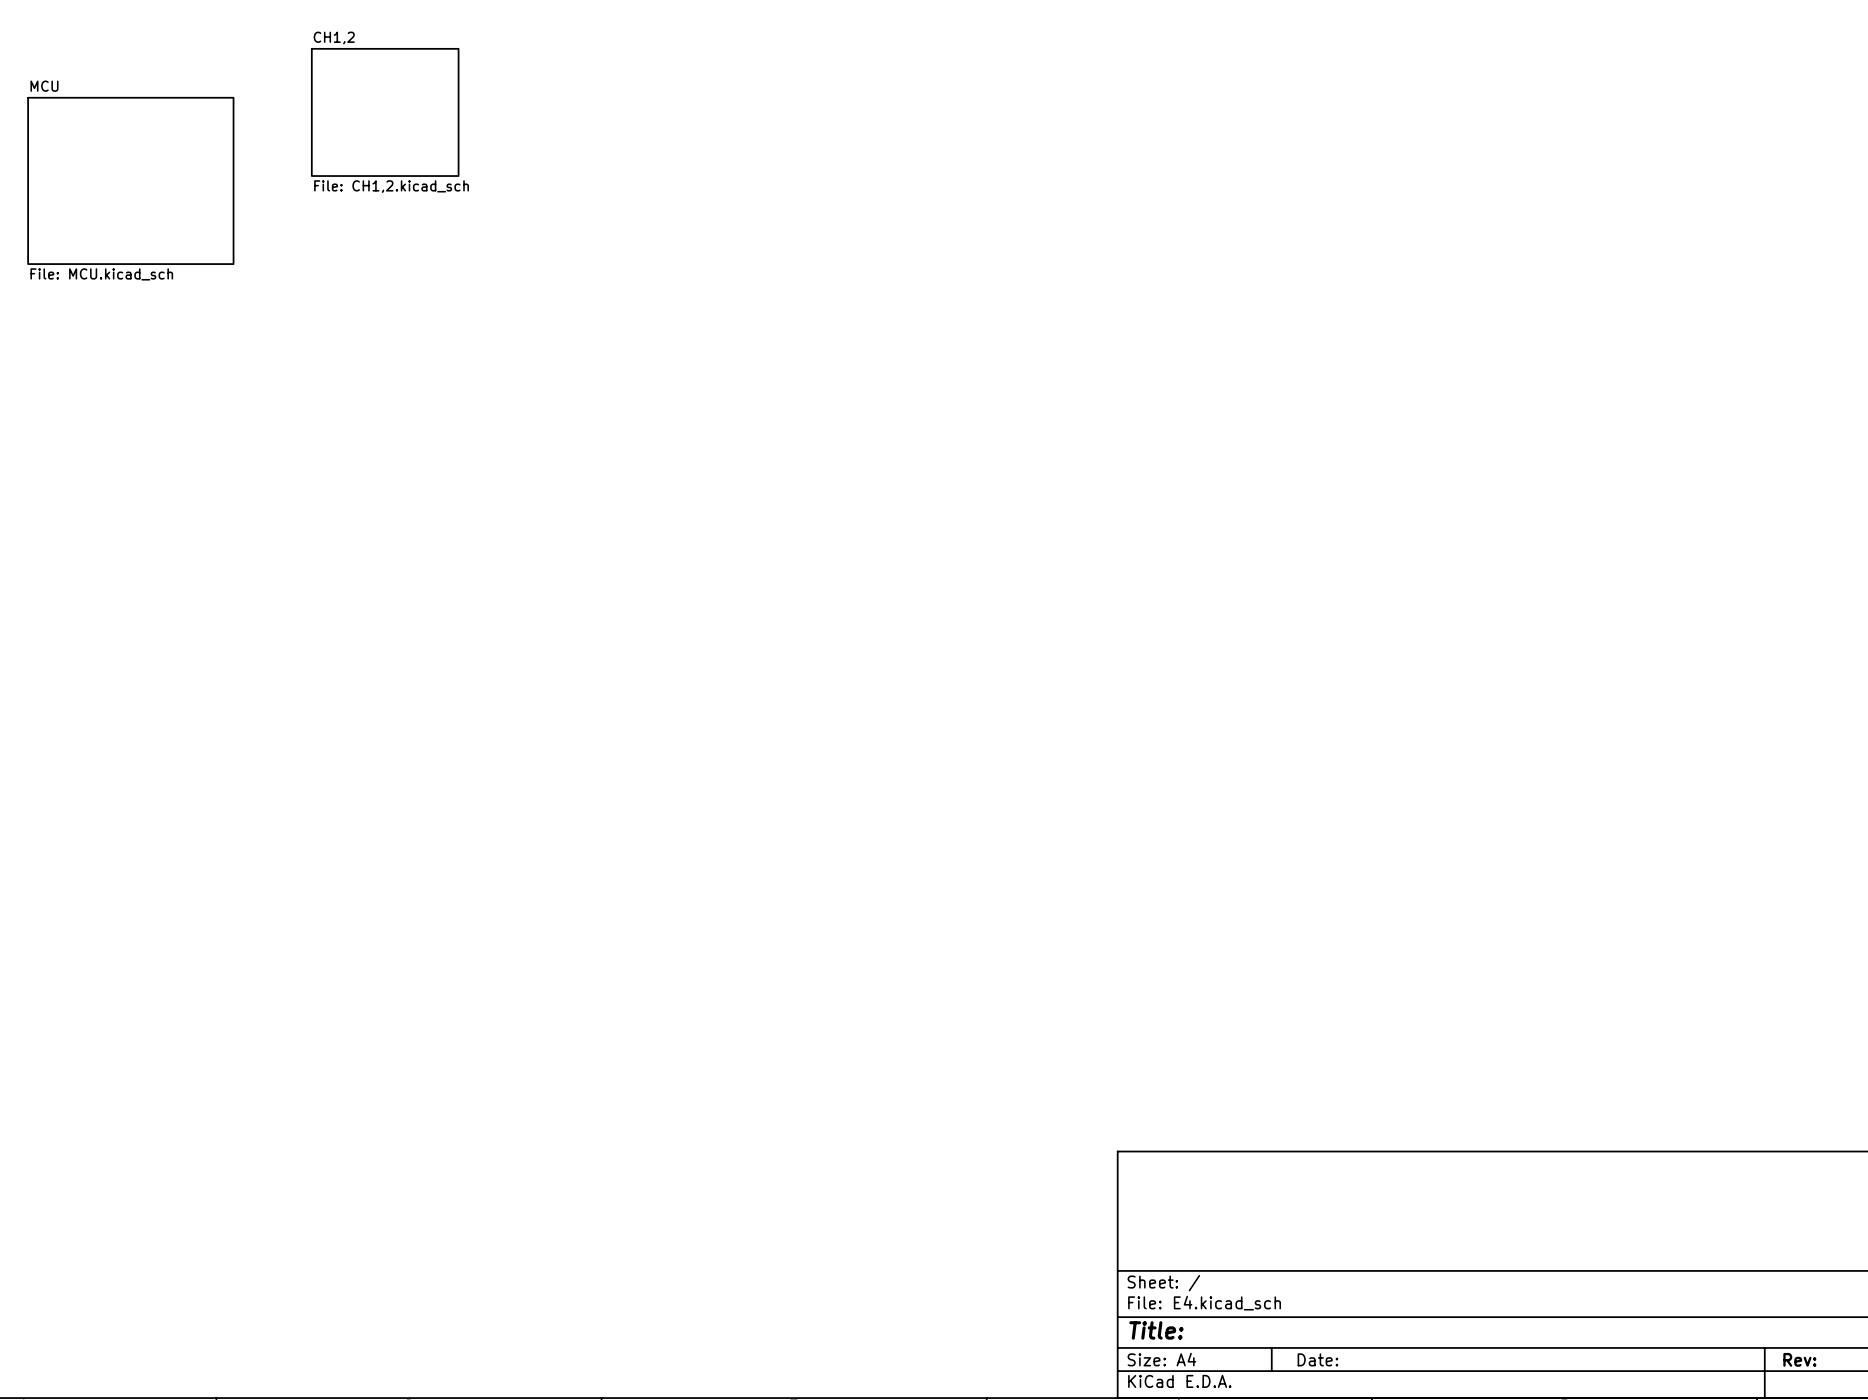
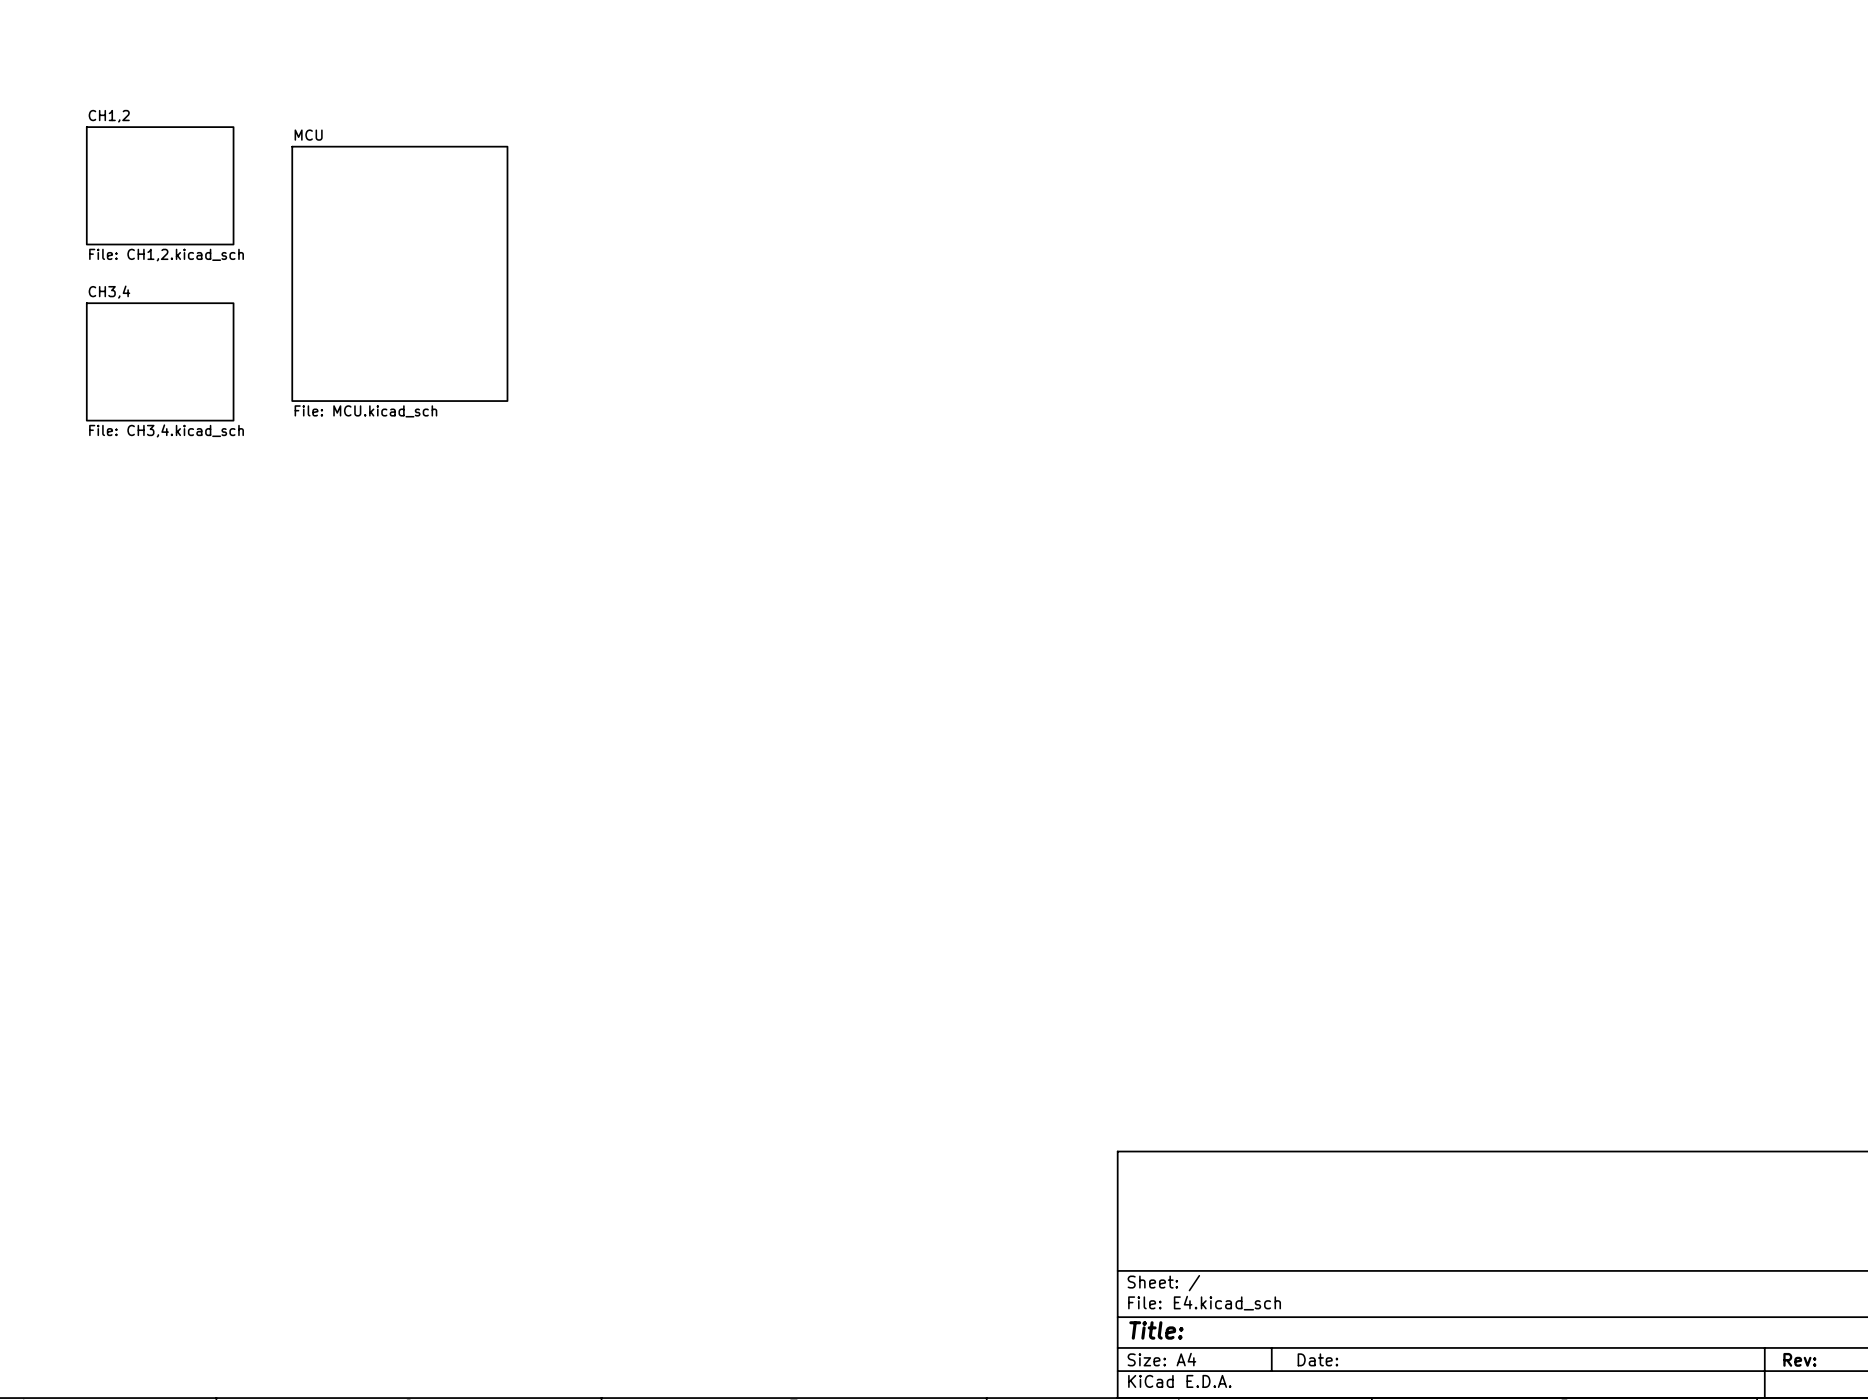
sheet CH1,2 shape: [311, 48, 460, 177] -> [86, 126, 235, 246]
sheet MCU: File: MCU.kicad_sch (130, 180) -> none
sheet MCU: none -> File: MCU.kicad_sch (399, 273)
sheet CH3,4: none -> File: CH3,4.kicad_sch (160, 361)

